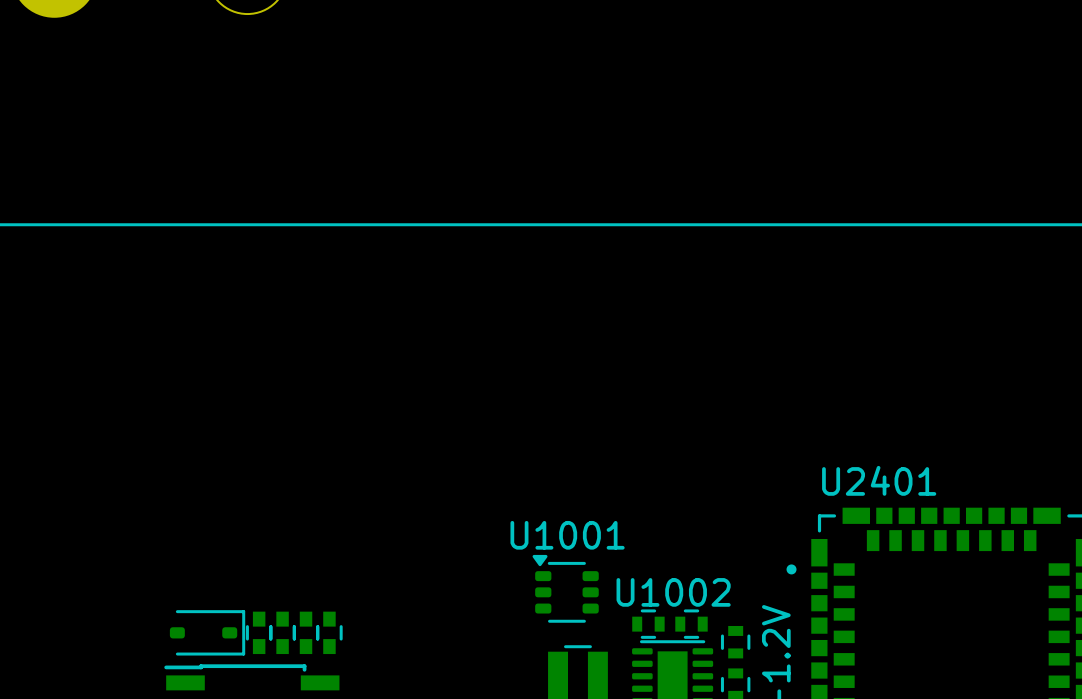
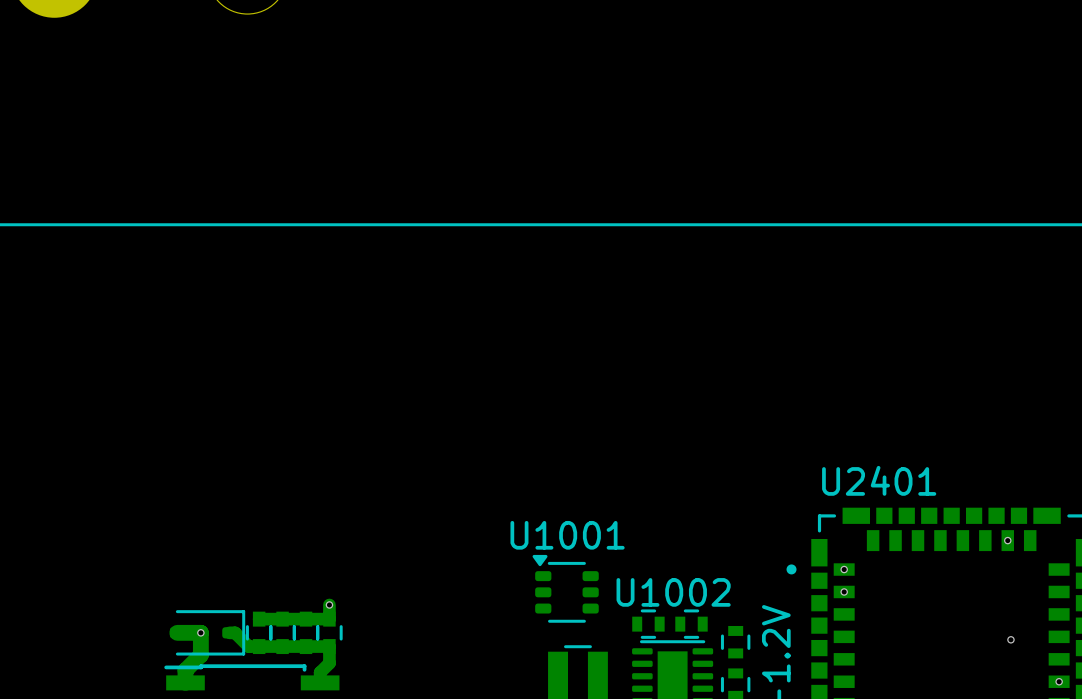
via: none -> (1007, 540)
via: none -> (844, 569)
via: none -> (844, 591)
track: none -> (329, 604) (329, 619) (259, 619)
via: none -> (329, 604)
track: none -> (177, 632) (200, 632) (200, 655) (185, 670) (185, 682)
via: none -> (200, 632)
track: none -> (229, 632) (235, 632) (248, 646) (329, 646) (329, 663) (320, 672) (320, 682)
via: none -> (1010, 639)
via: none -> (1059, 681)

